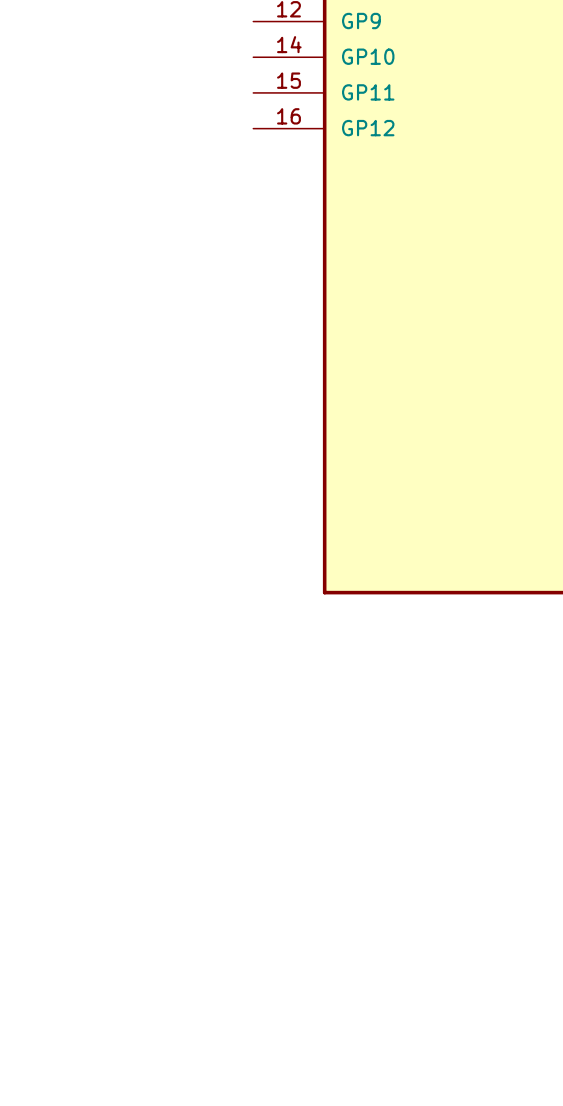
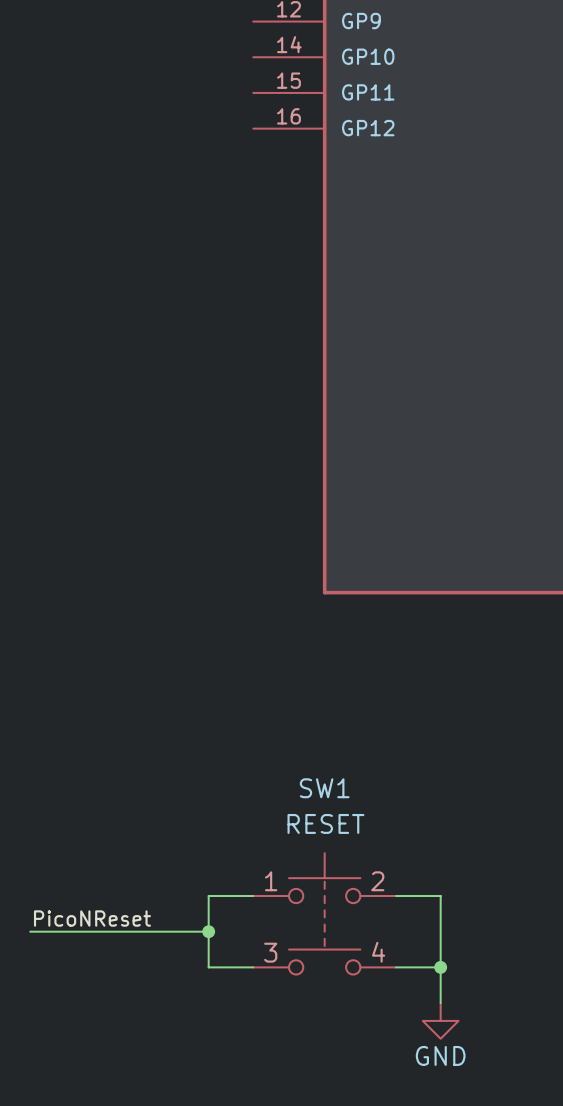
wire: none -> (253, 896) (208, 896) (208, 967) (253, 967)
wire: none -> (396, 896) (440, 896) (440, 1003)
SW1: none -> RESET (324, 913)
label: none -> PicoNReset (92, 918)
wire: none -> (30, 931) (208, 931)
junction: none -> (208, 931)
wire: none -> (396, 967) (440, 967)
junction: none -> (440, 967)
power symbol: none -> GND (440, 1020)

